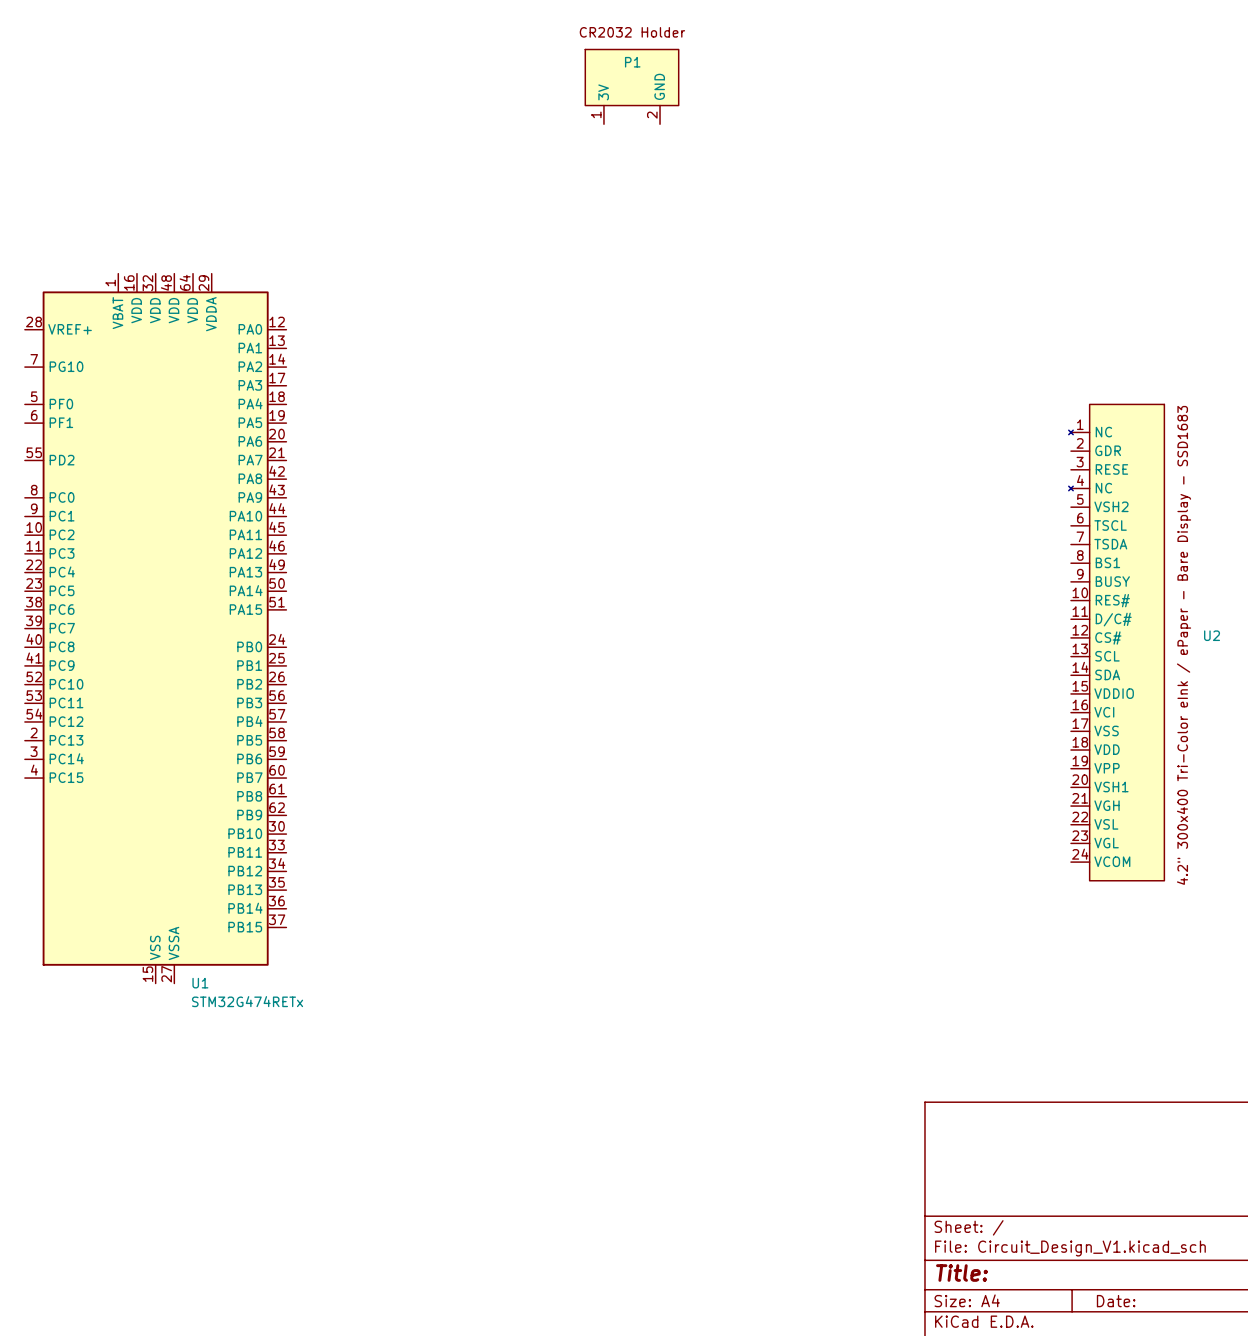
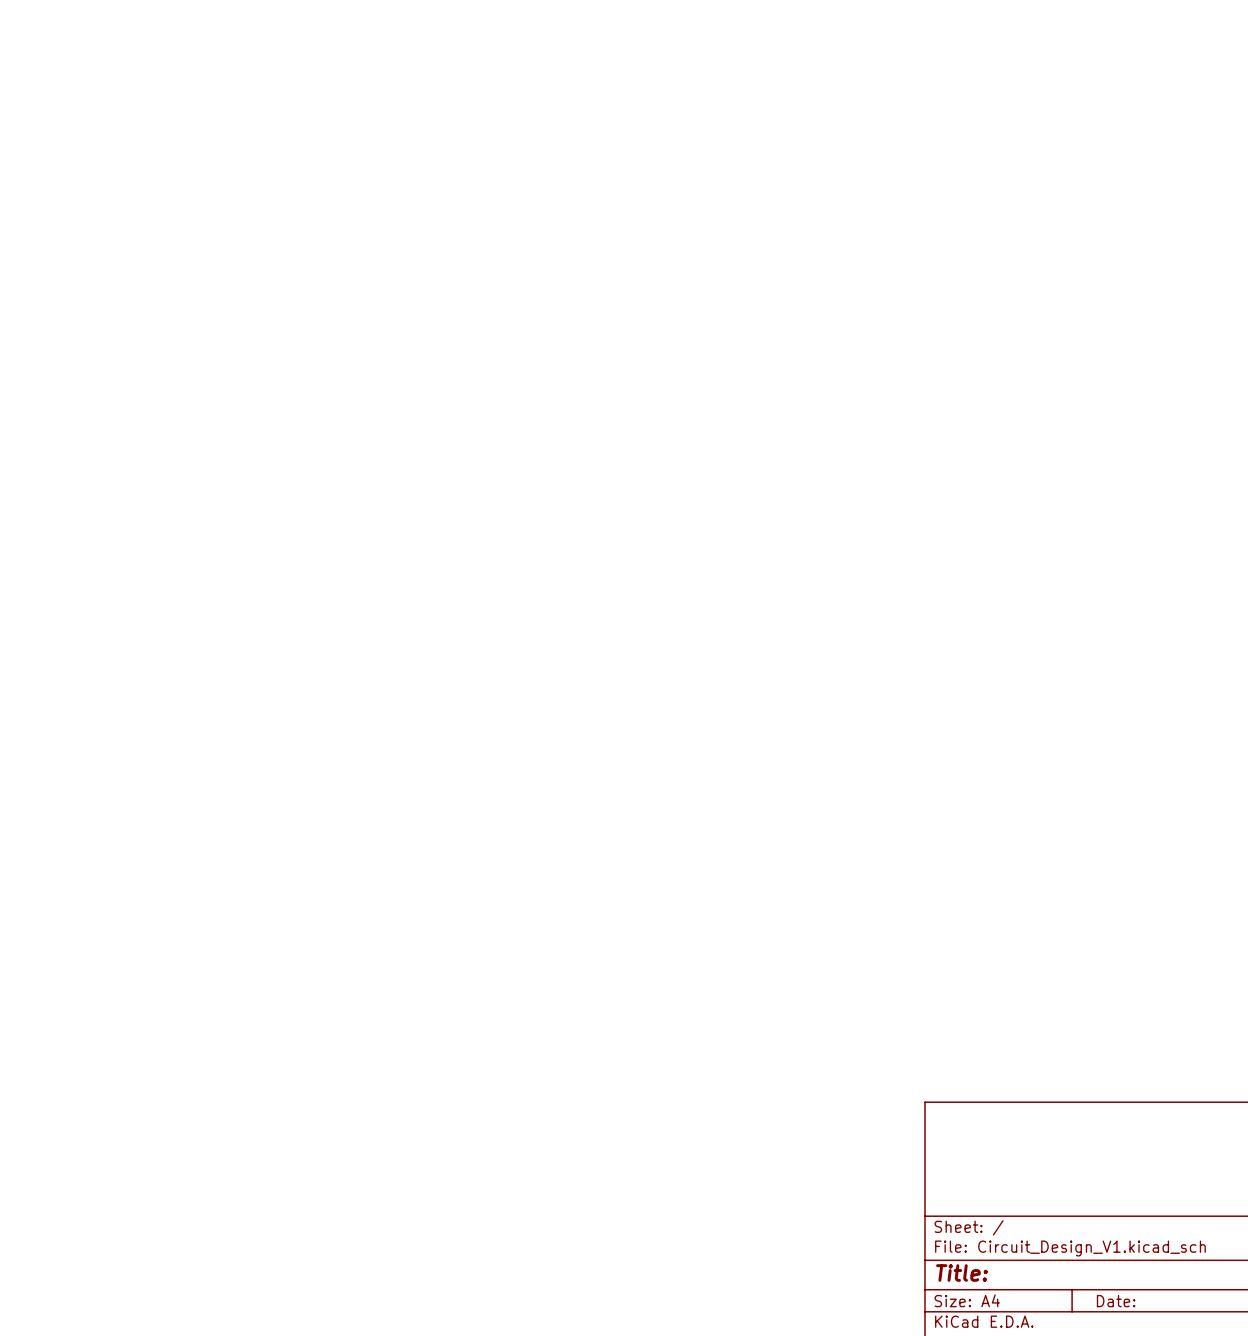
P1: (631, 86) -> none
U1: STM32G474RETx (155, 628) -> none
U2: (1116, 642) -> none

